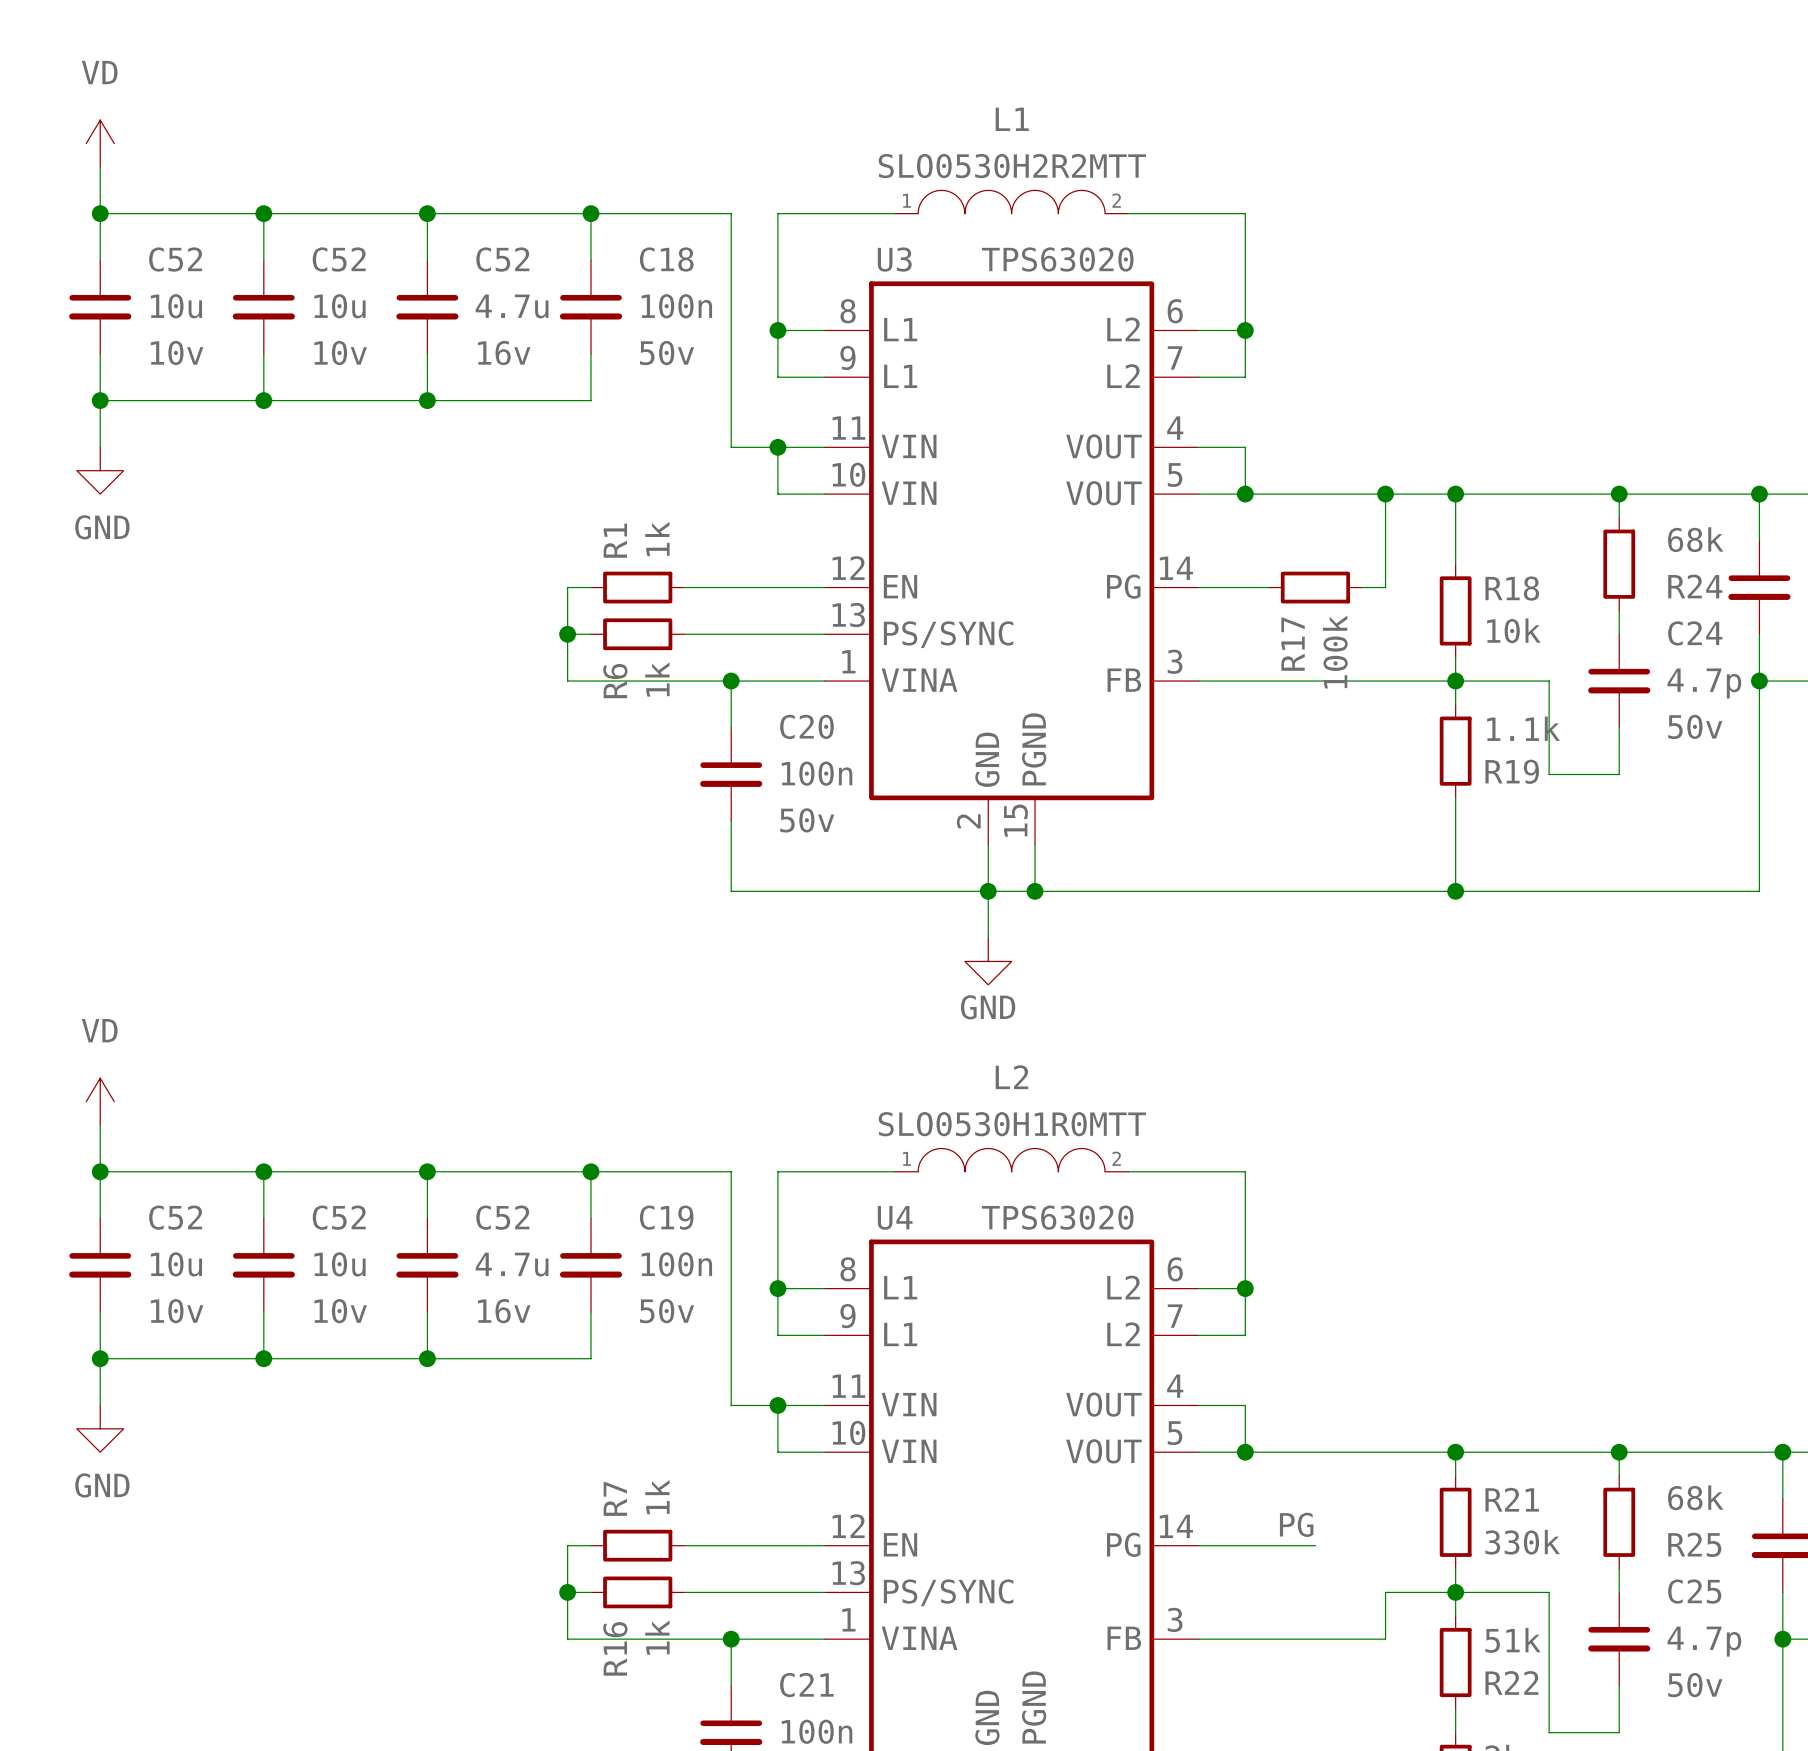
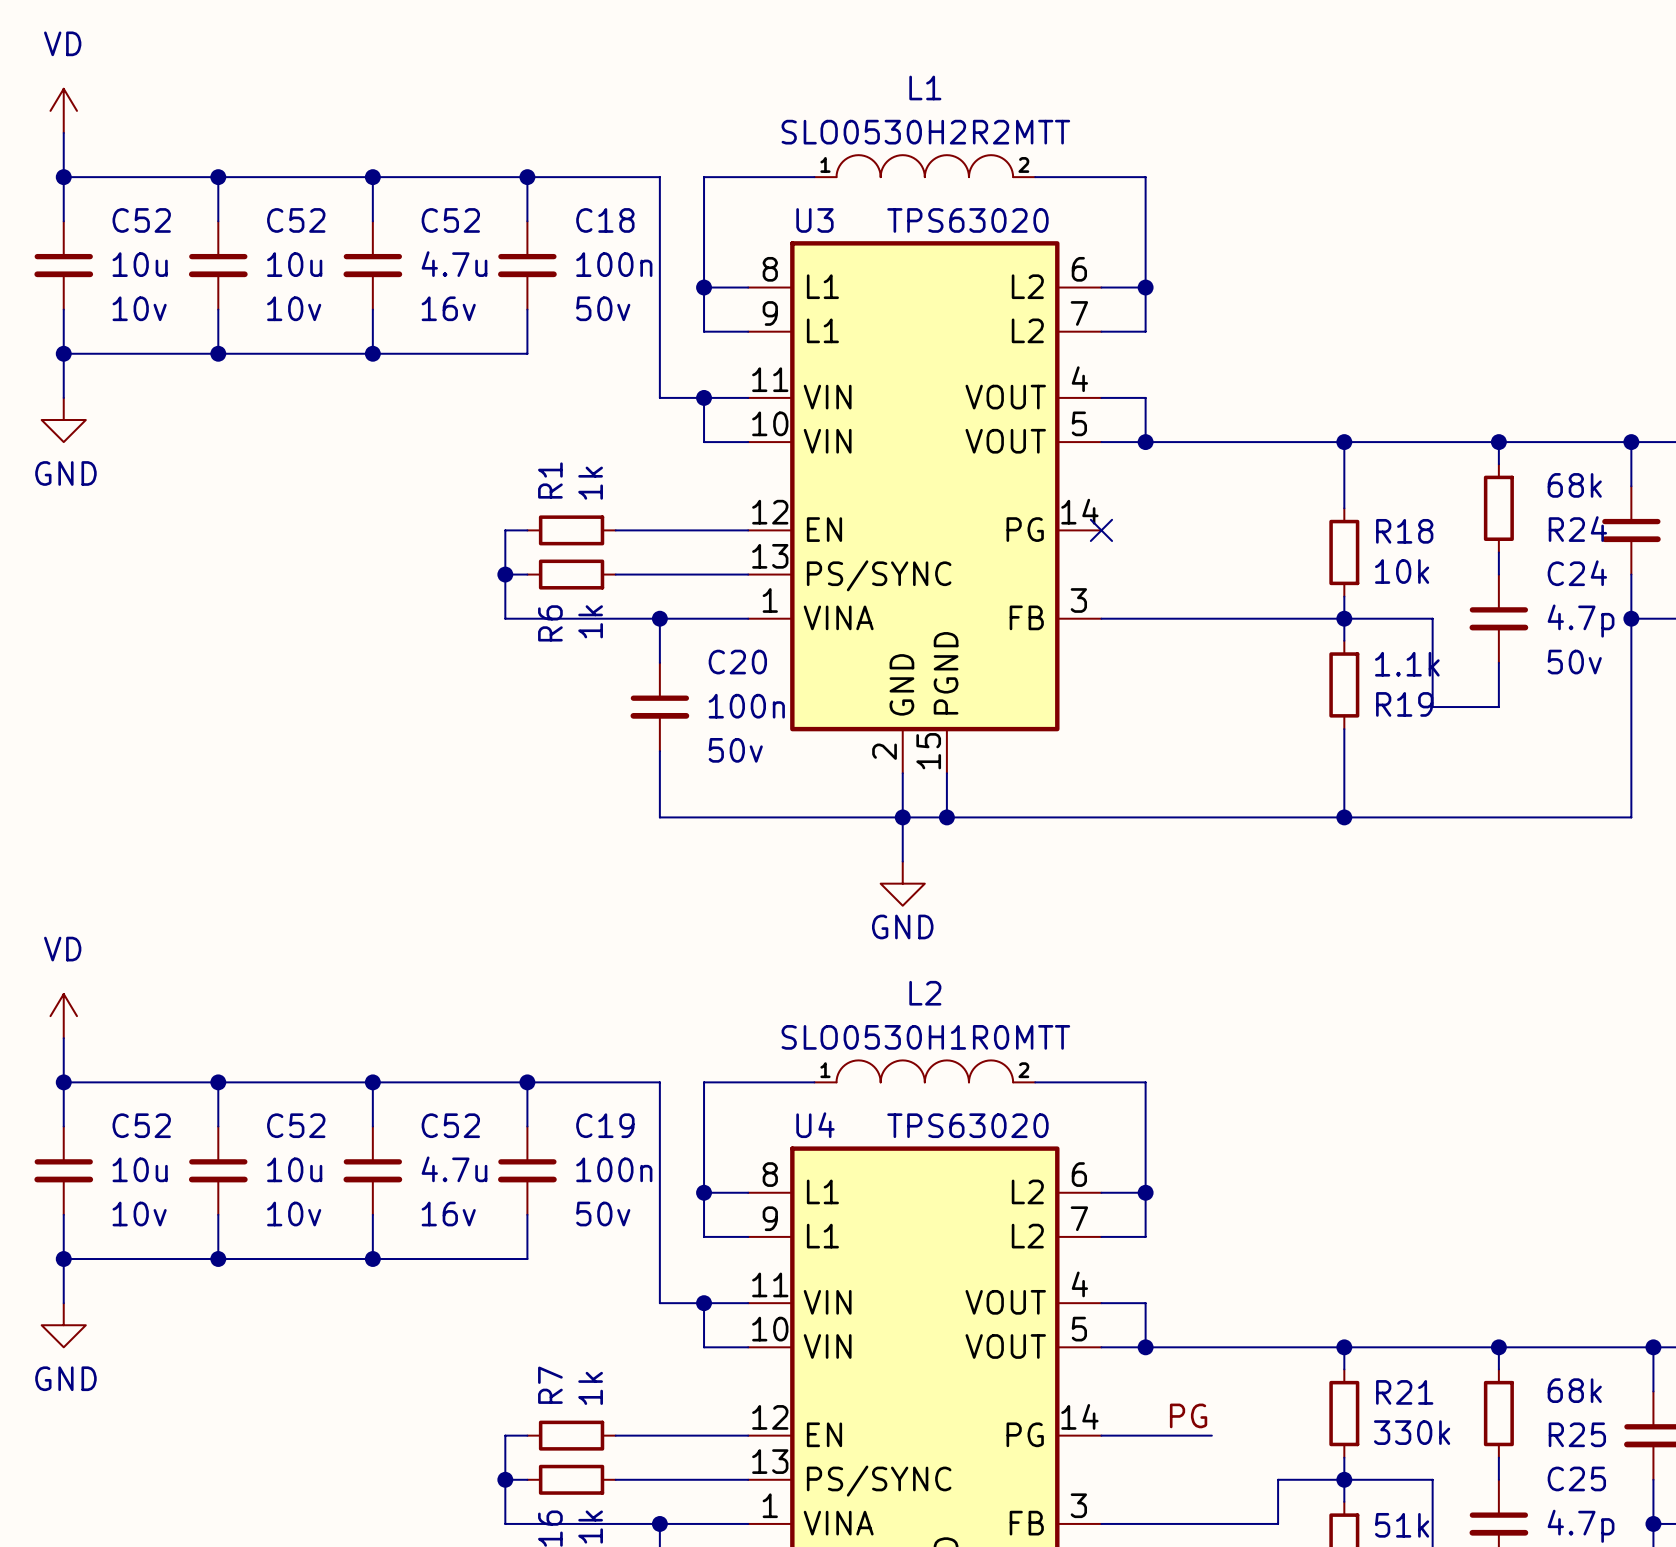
wire: (1385, 494) (1385, 587) (1362, 587) -> none
junction: (1385, 494) -> none
wire: (1198, 587) (1268, 587) -> none
no-connect mark: none -> (1101, 530)
R17: 100k (1315, 587) -> none

